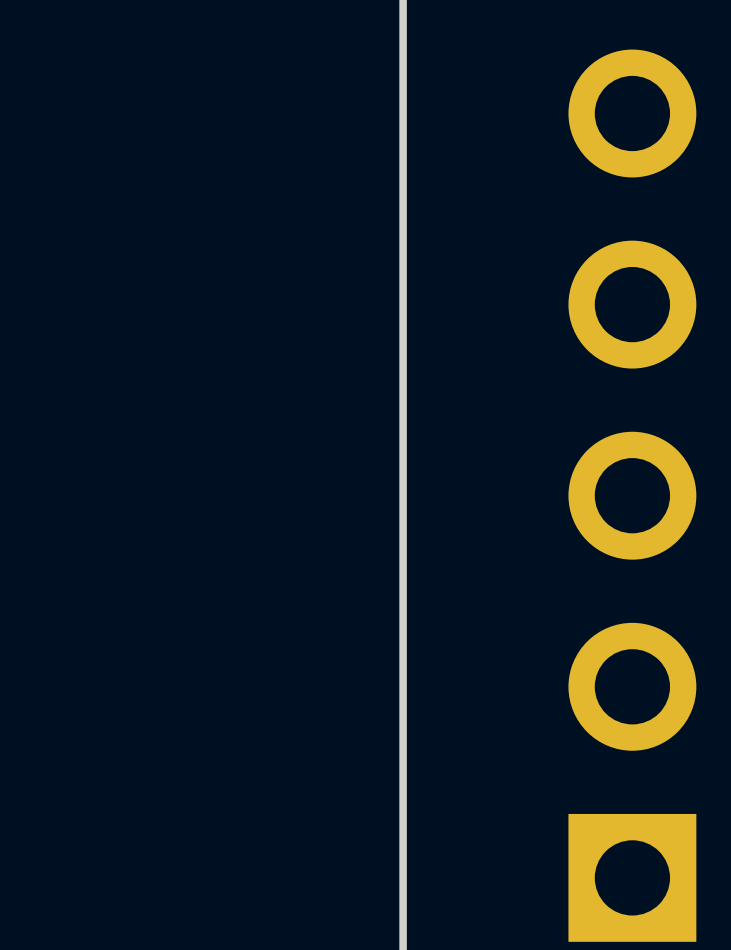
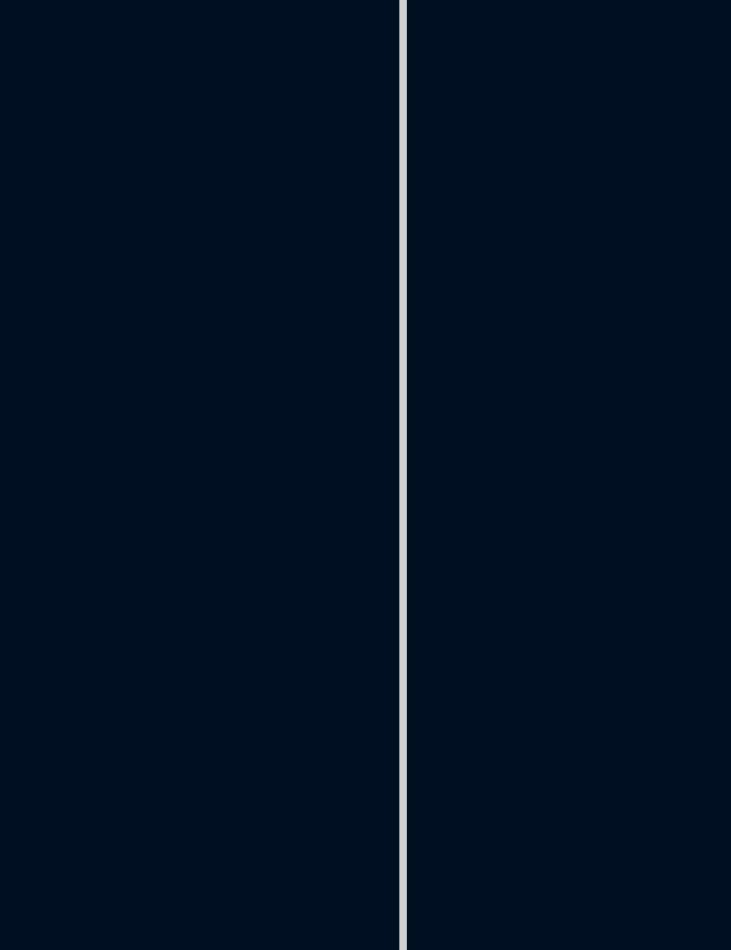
part: (632, 495) -> none

